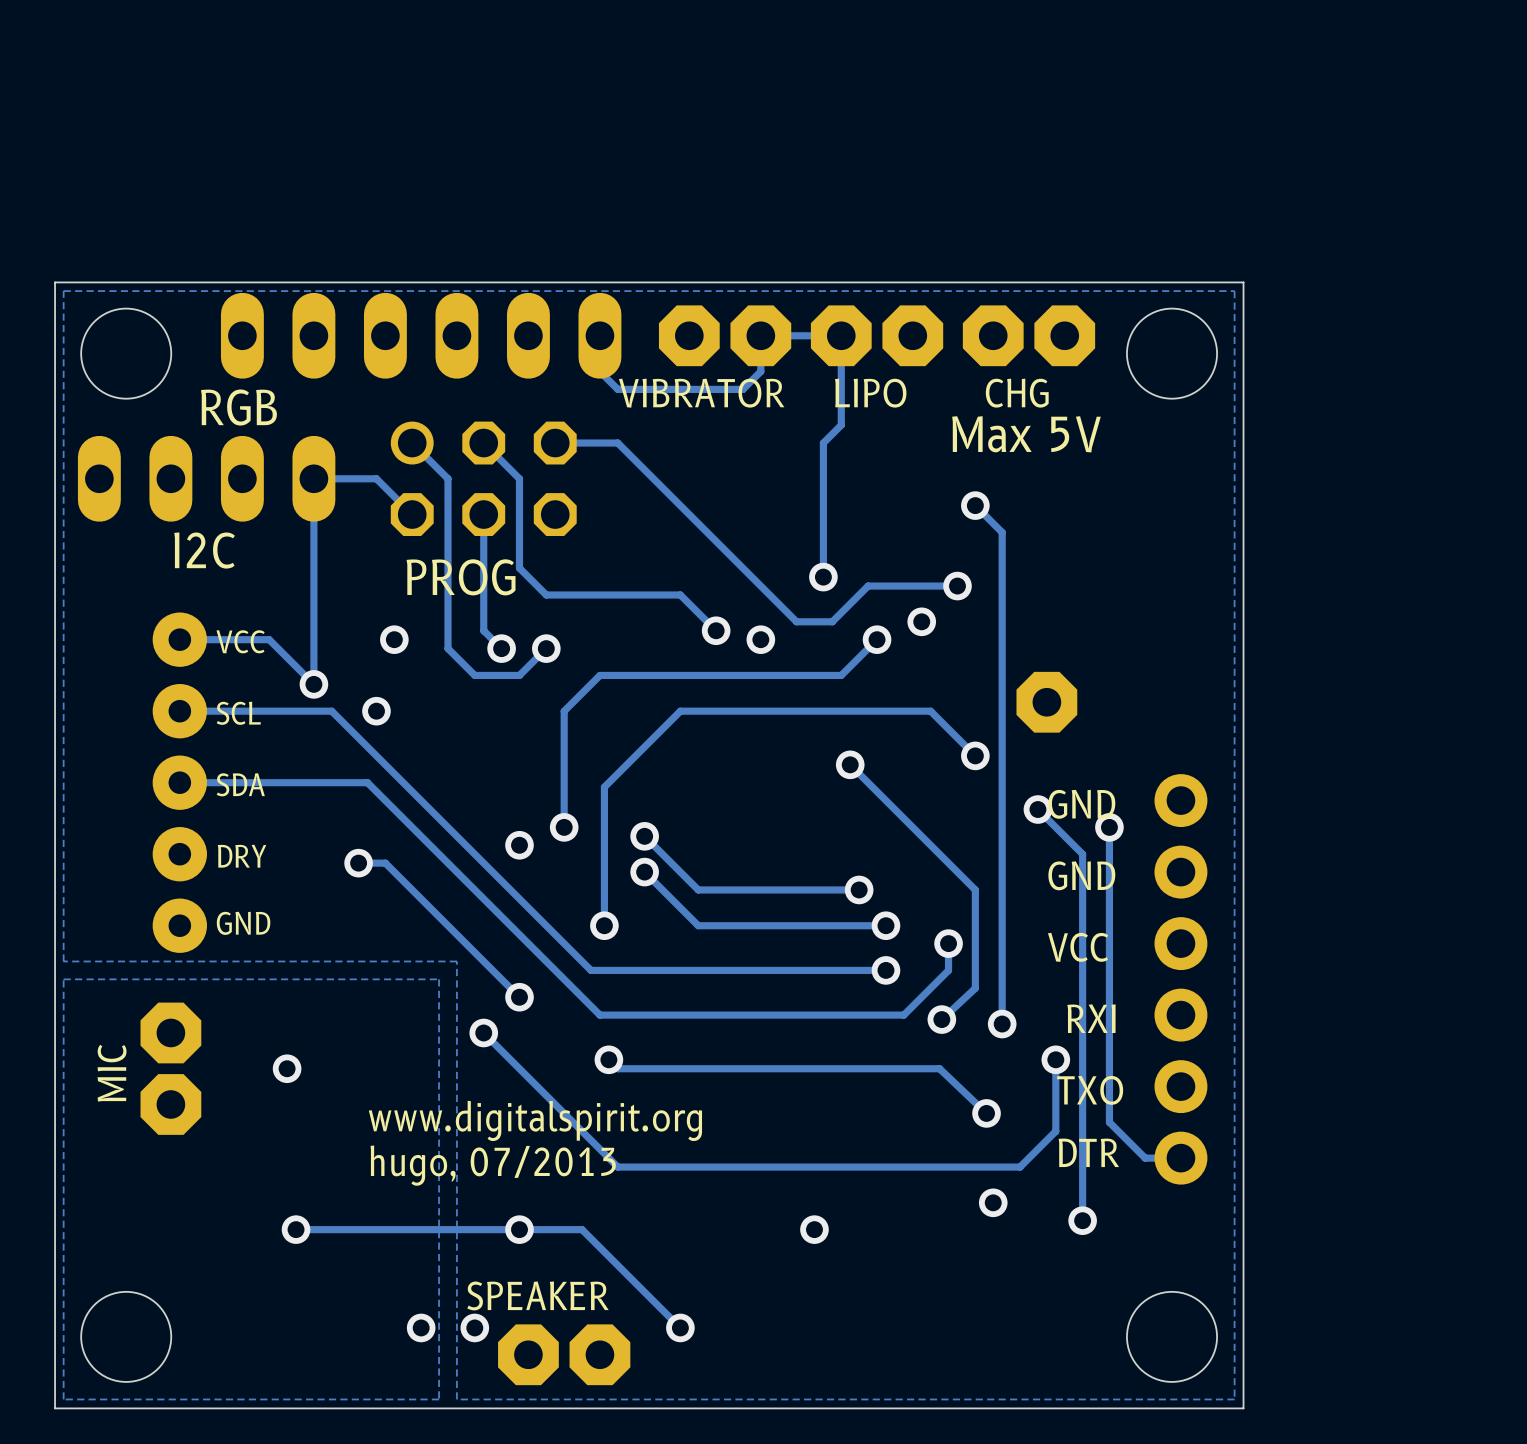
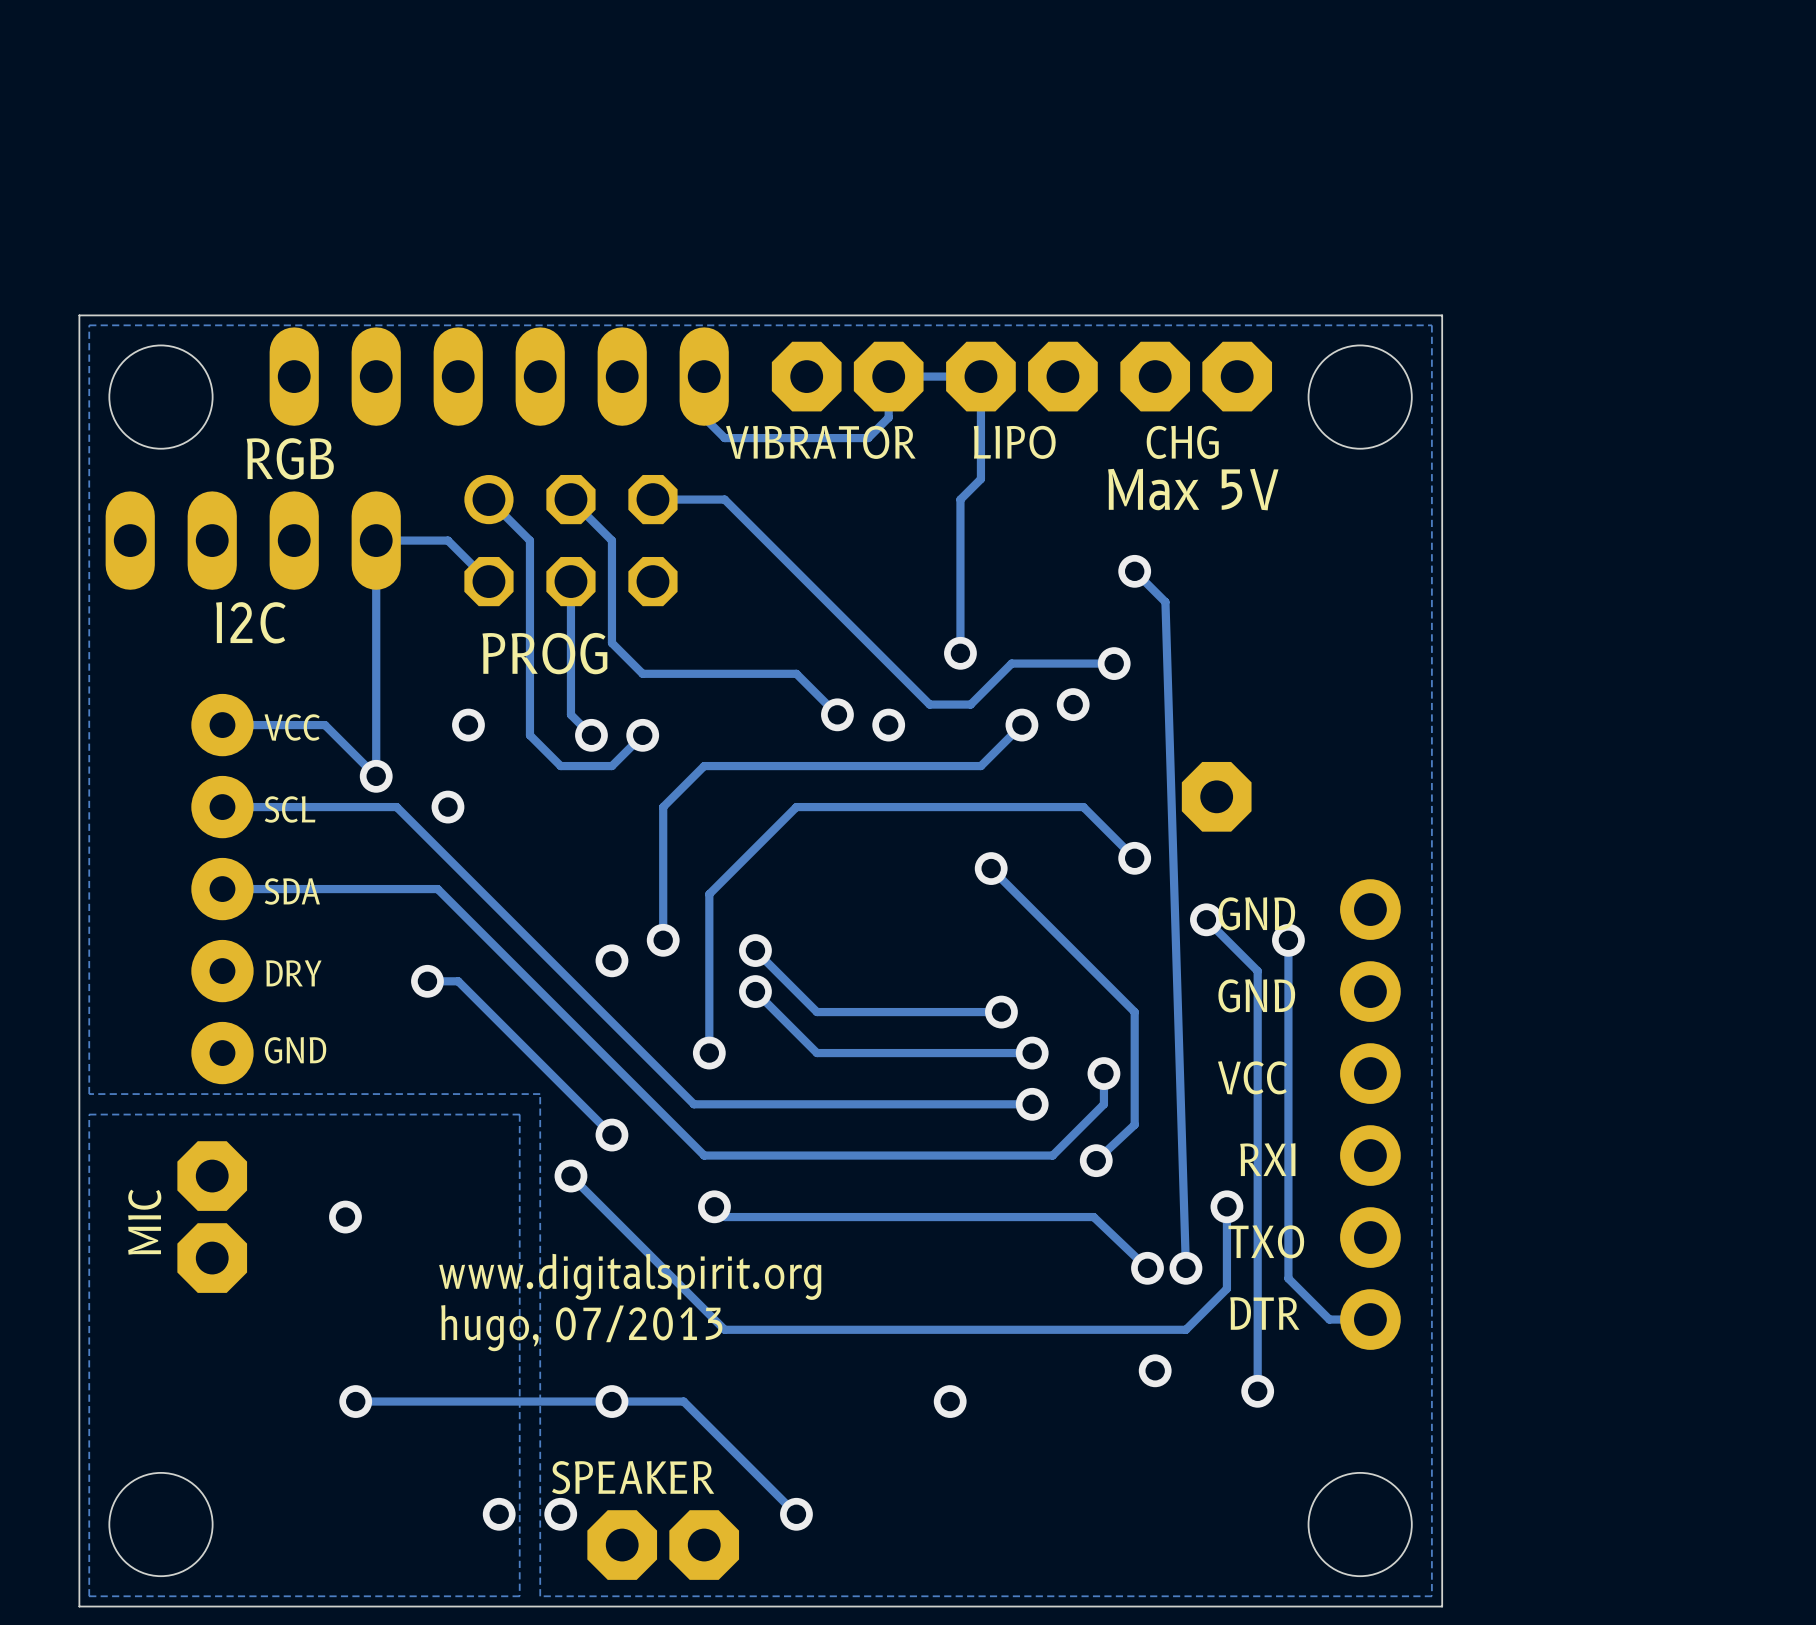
track: (1002, 532) (1002, 1024) -> (1165, 602) (1185, 1268)
via position: (1002, 1024) -> (1185, 1268)

